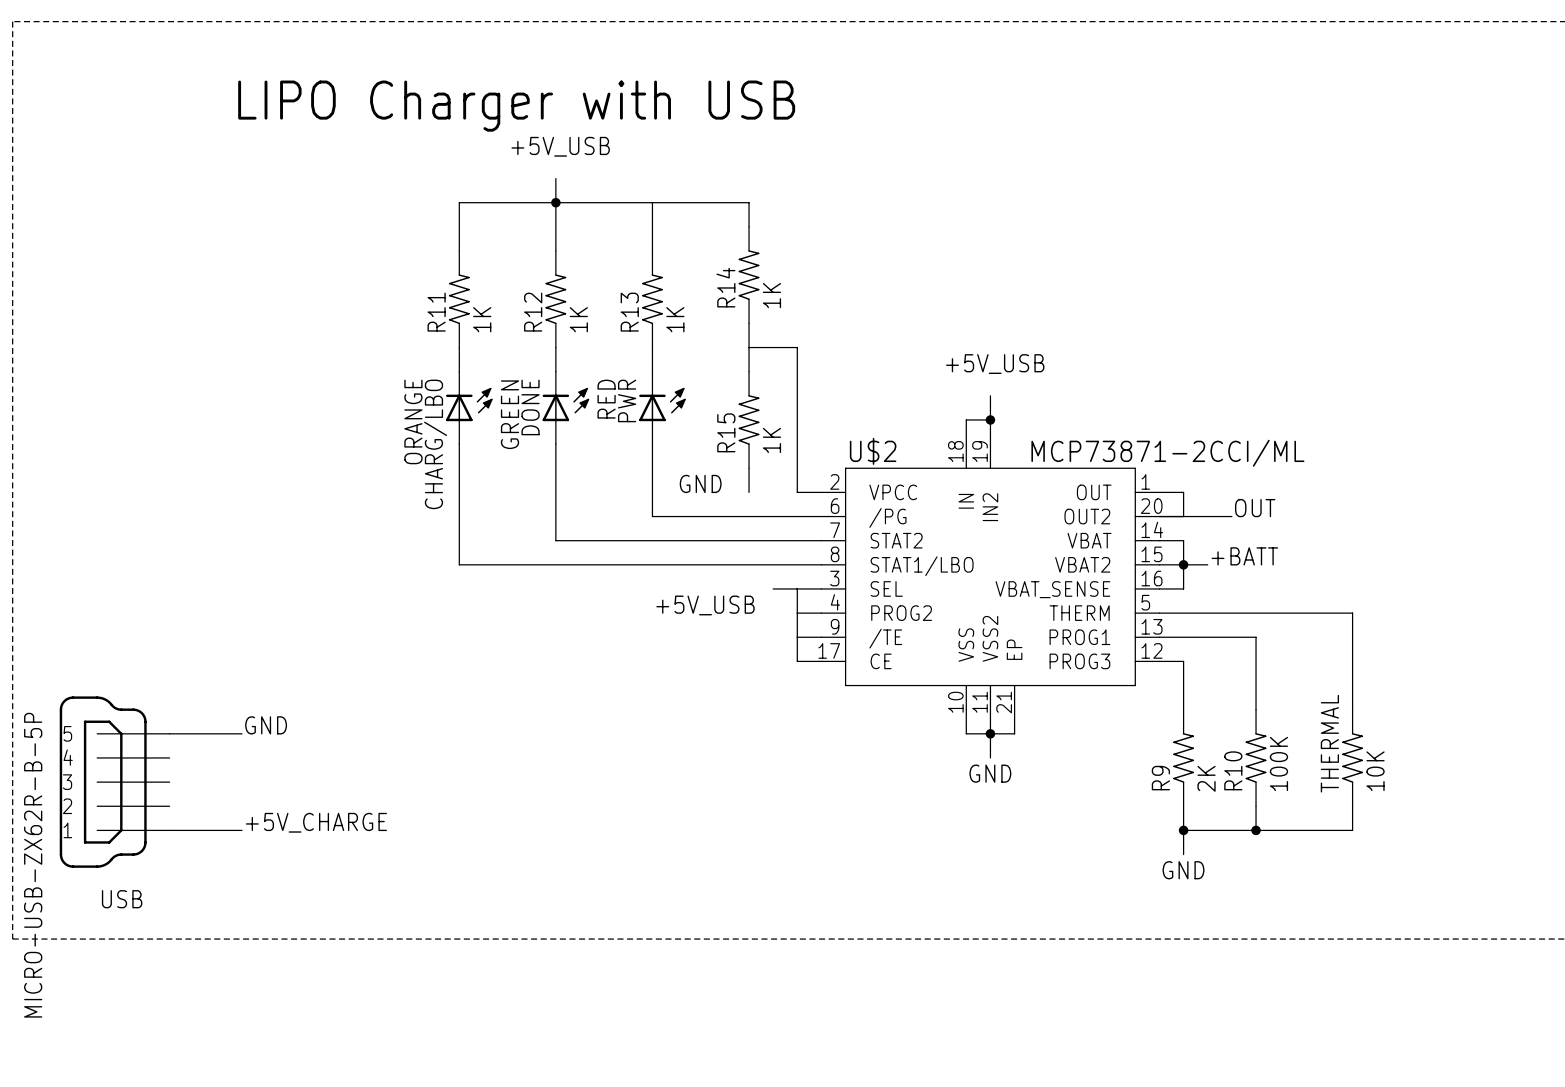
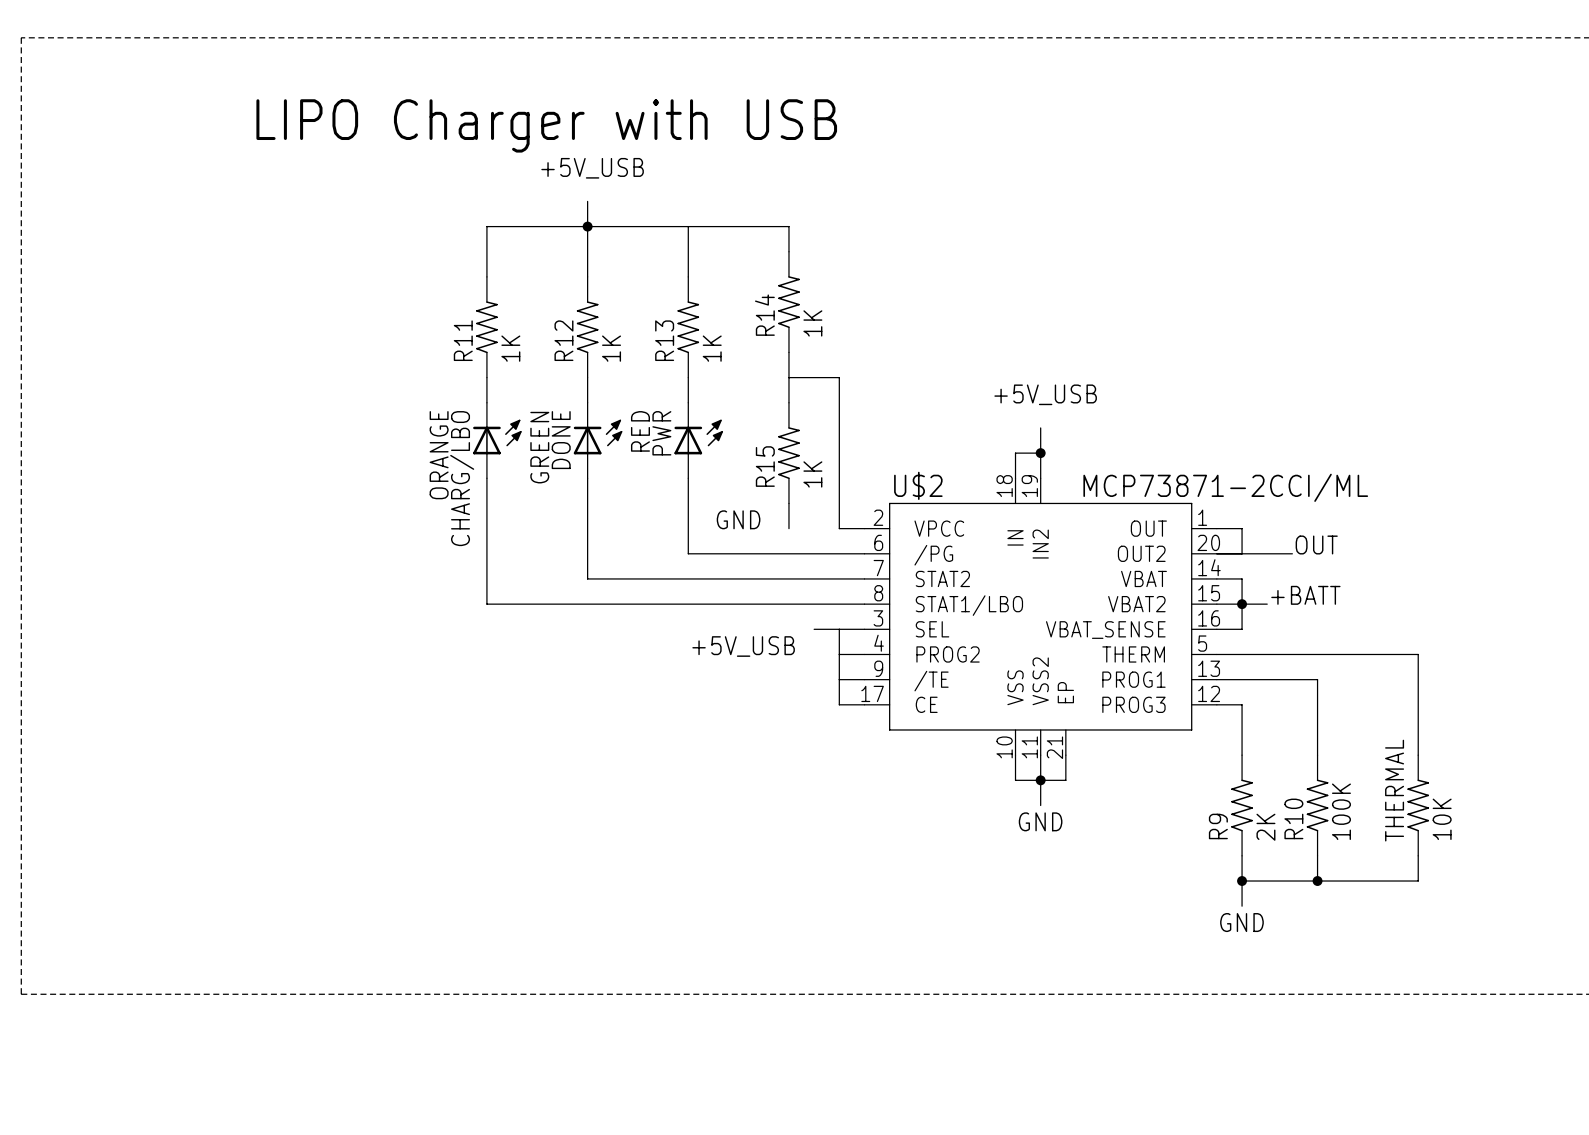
text: GND (266, 725) -> none
wire: (169, 733) (242, 733) -> none
USB: MICRO-USB-ZX62R-B-5P (114, 782) -> none
text: +5V_CHARGE (316, 822) -> none
wire: (169, 830) (242, 830) -> none

